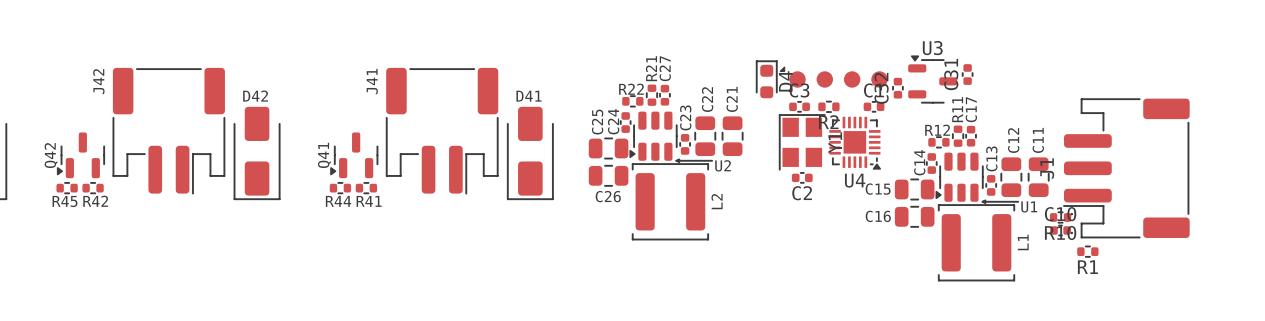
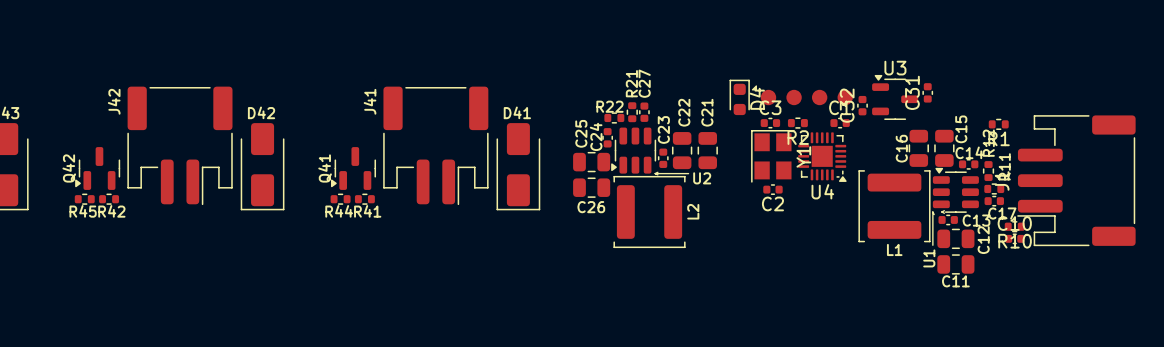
R11 rotation: 0° (958, 136) -> 90° clockwise (994, 188)
R11 position: (958, 136) -> (994, 188)
C17 rotation: 0° (971, 136) -> 90° clockwise (994, 201)
C17 position: (971, 136) -> (994, 201)
C11 name position: C11 (1038, 140) -> C11 (955, 281)
R12 rotation: 0° (938, 142) -> 90° clockwise (988, 171)
R12 position: (938, 142) -> (988, 171)
C14 rotation: 0° (931, 163) -> 90° clockwise (968, 164)
C14 position: (931, 163) -> (968, 164)
U1 rotation: 0° (959, 177) -> 90° clockwise (955, 190)
U1 position: (959, 177) -> (955, 190)
C12 rotation: 0° (1011, 177) -> 90° clockwise (955, 238)
C12 position: (1011, 177) -> (955, 238)
C11 rotation: 0° (1038, 177) -> 90° clockwise (955, 264)
C11 position: (1038, 177) -> (955, 264)
C13 rotation: 0° (991, 185) -> 90° clockwise (948, 219)
C13 position: (991, 185) -> (948, 219)
C15 rotation: 0° (914, 189) -> 90° clockwise (944, 148)
C15 position: (914, 189) -> (944, 148)
line: (982, 201) (1018, 201) -> none
line: none -> (934, 214) (932, 211) (932, 245)
C16 rotation: 0° (914, 216) -> 90° clockwise (918, 148)
C16 position: (914, 216) -> (918, 148)
L1 rotation: 0° (976, 242) -> 90° clockwise (894, 206)
L1 position: (976, 242) -> (894, 206)
R1 position: (1087, 251) -> (998, 124)

